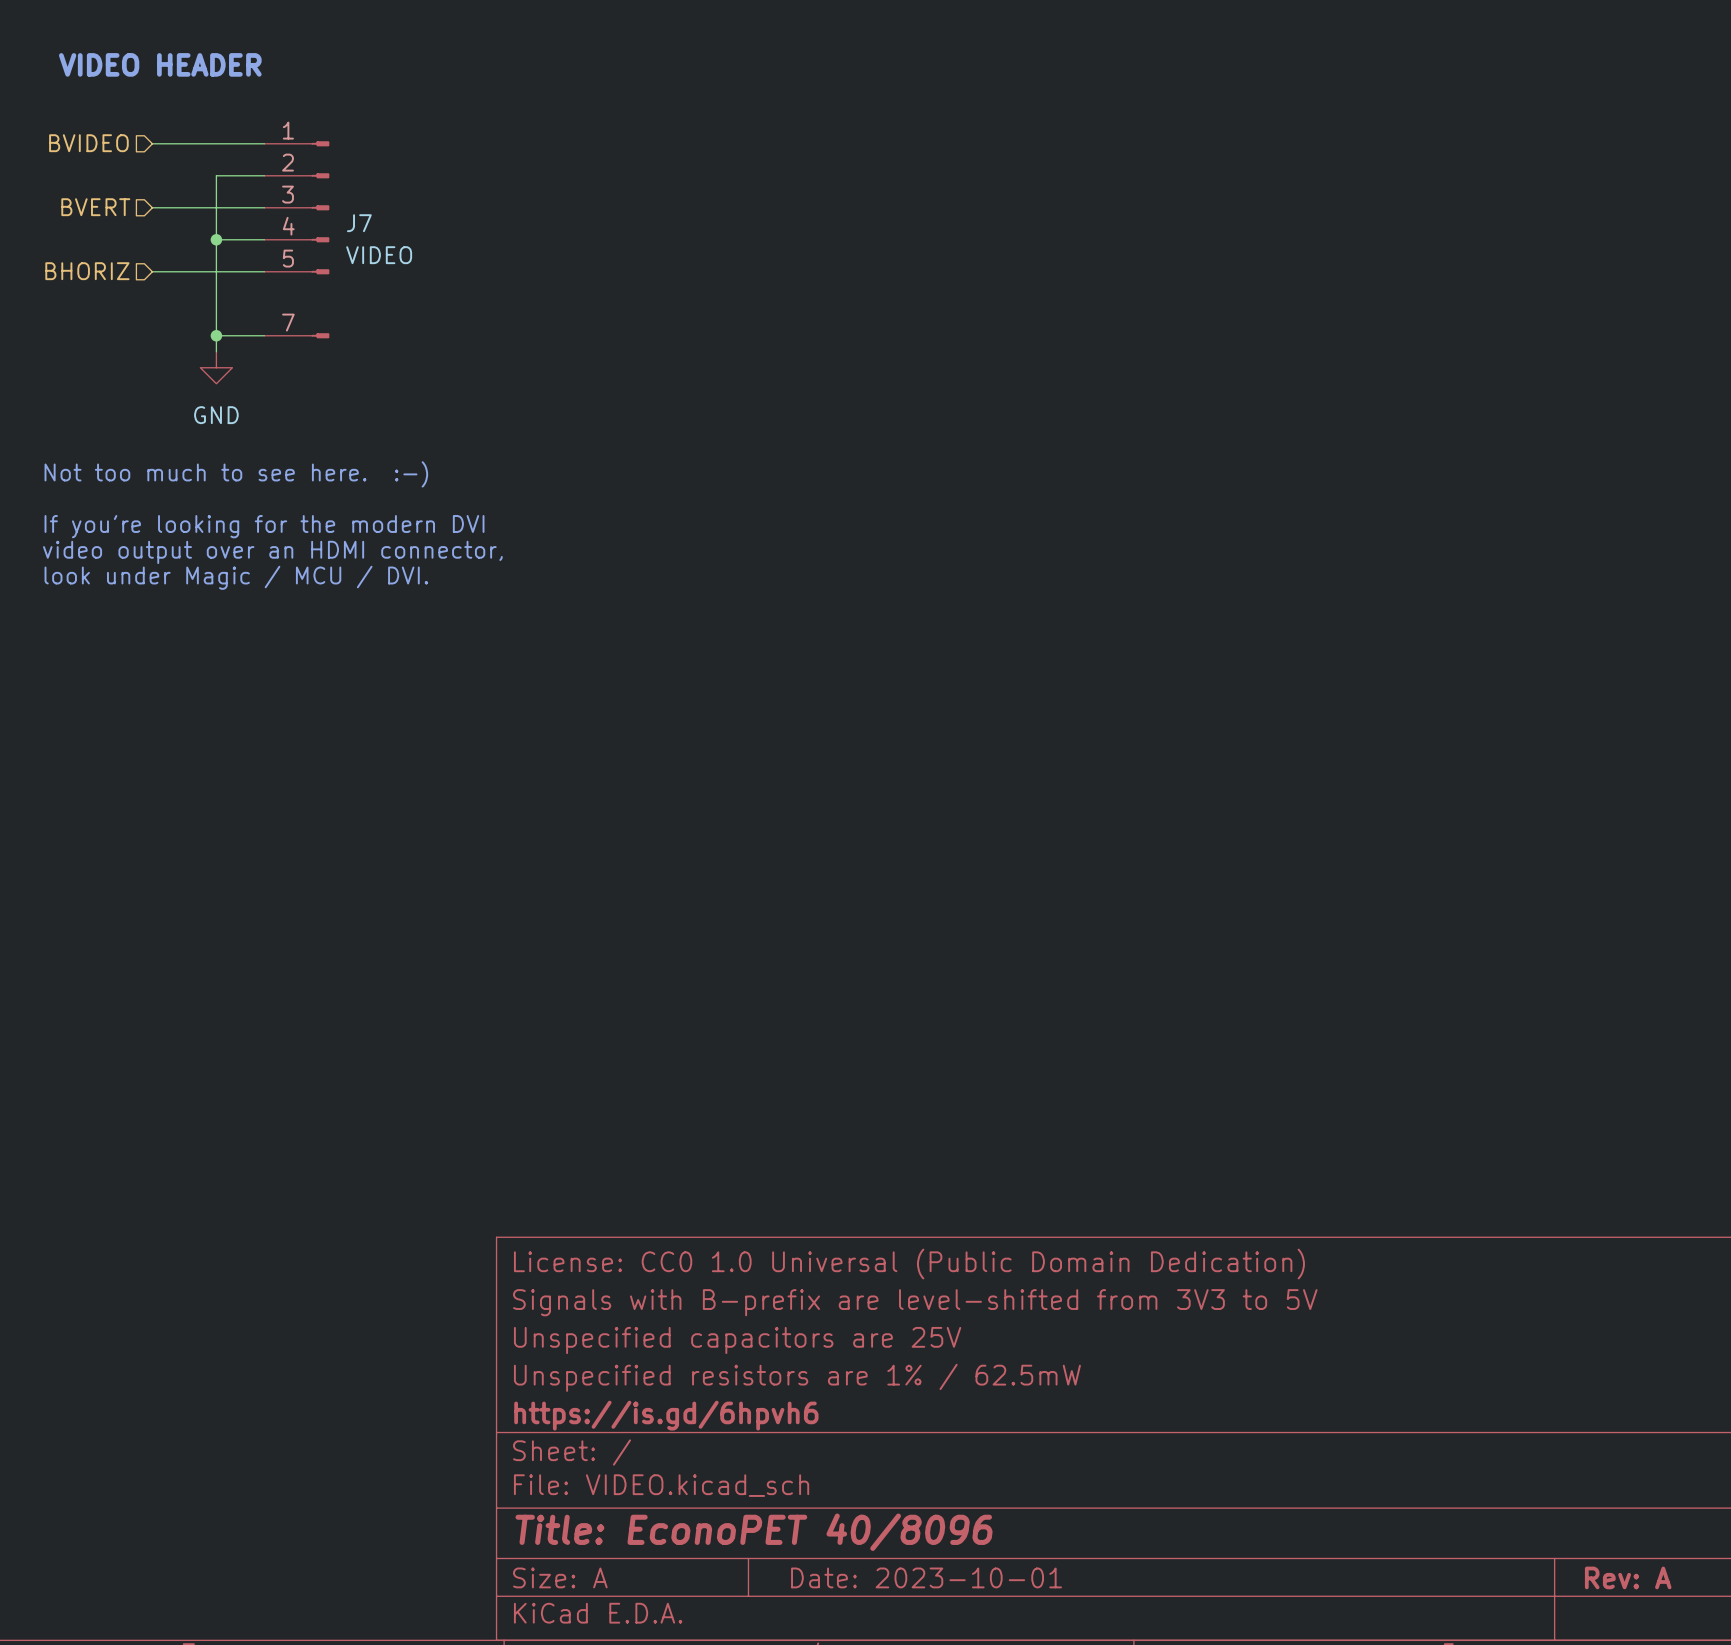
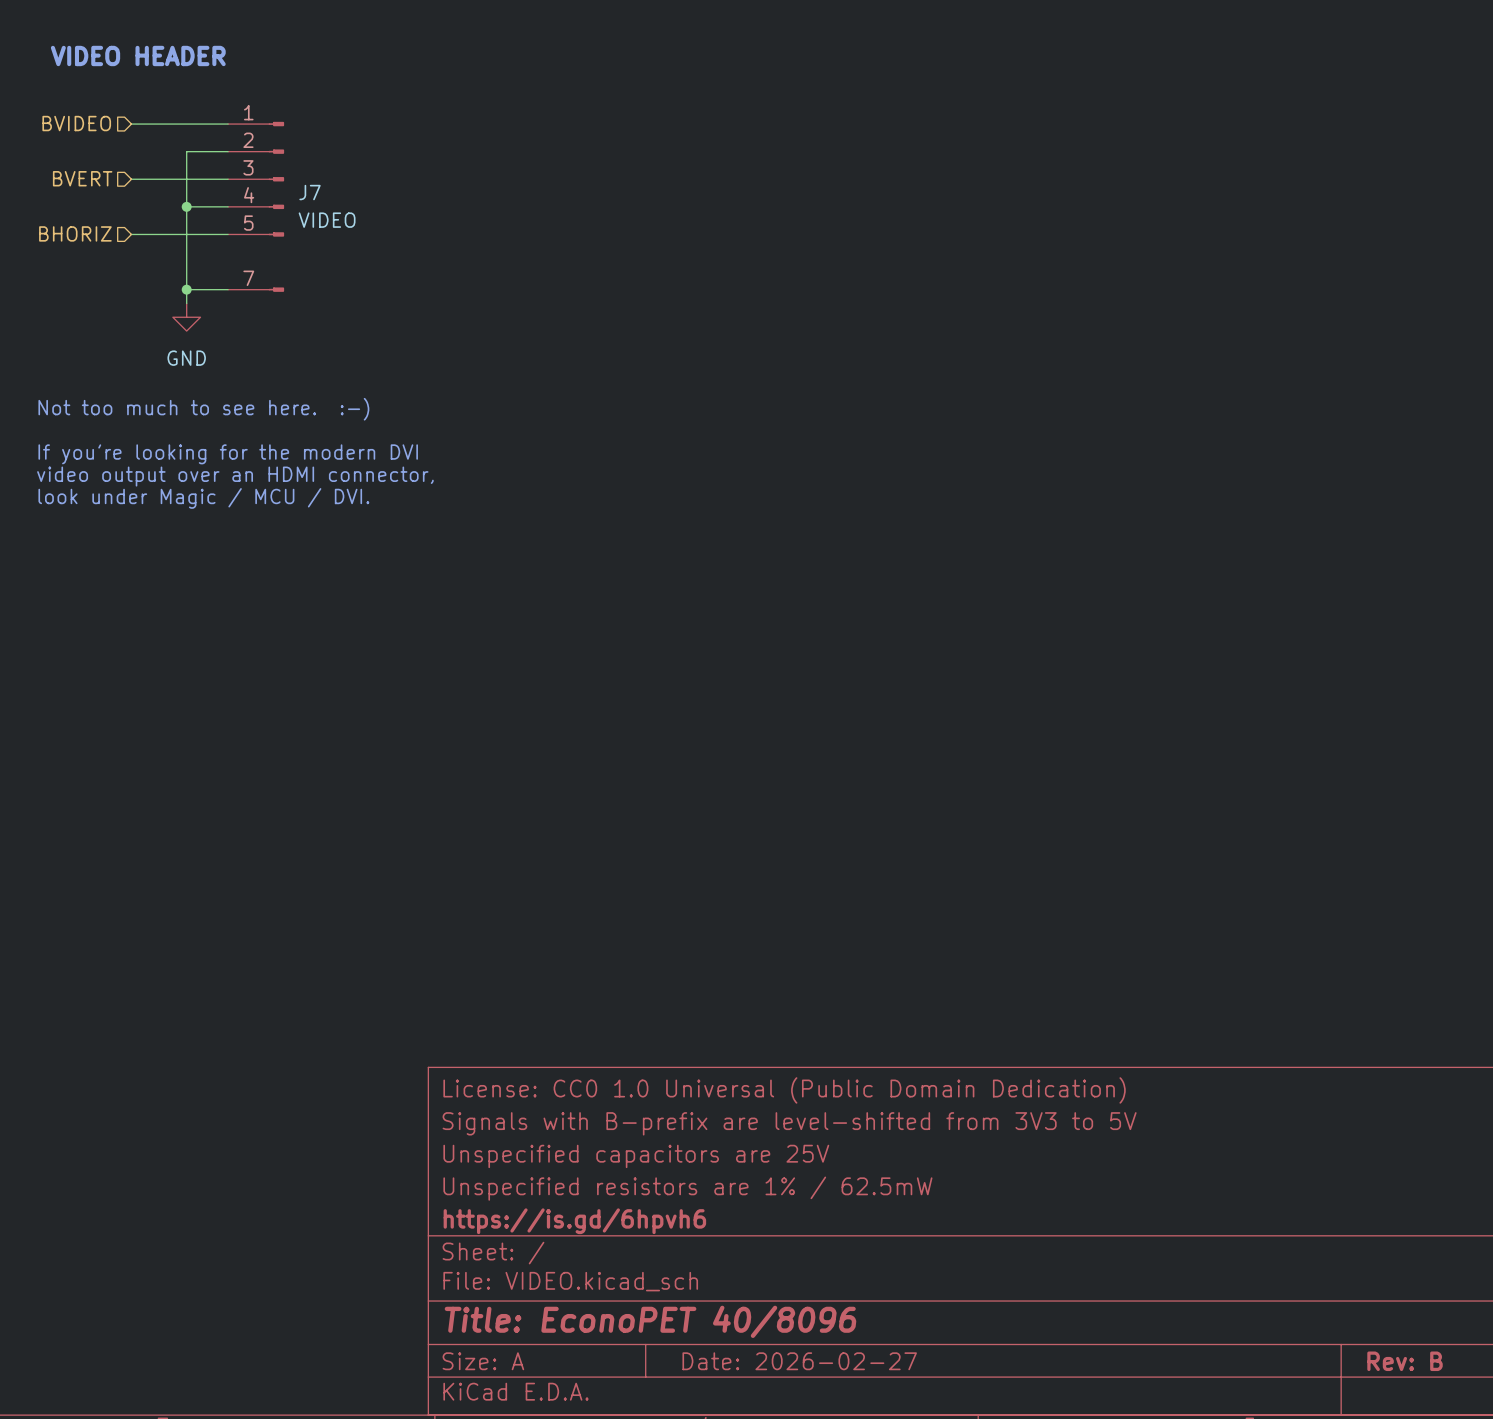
title block: Date: 2023-10-01 (926, 1577) -> Date: 2026-02-27 (799, 1361)
title block: Rev: A (1628, 1577) -> Rev: B (1405, 1361)

